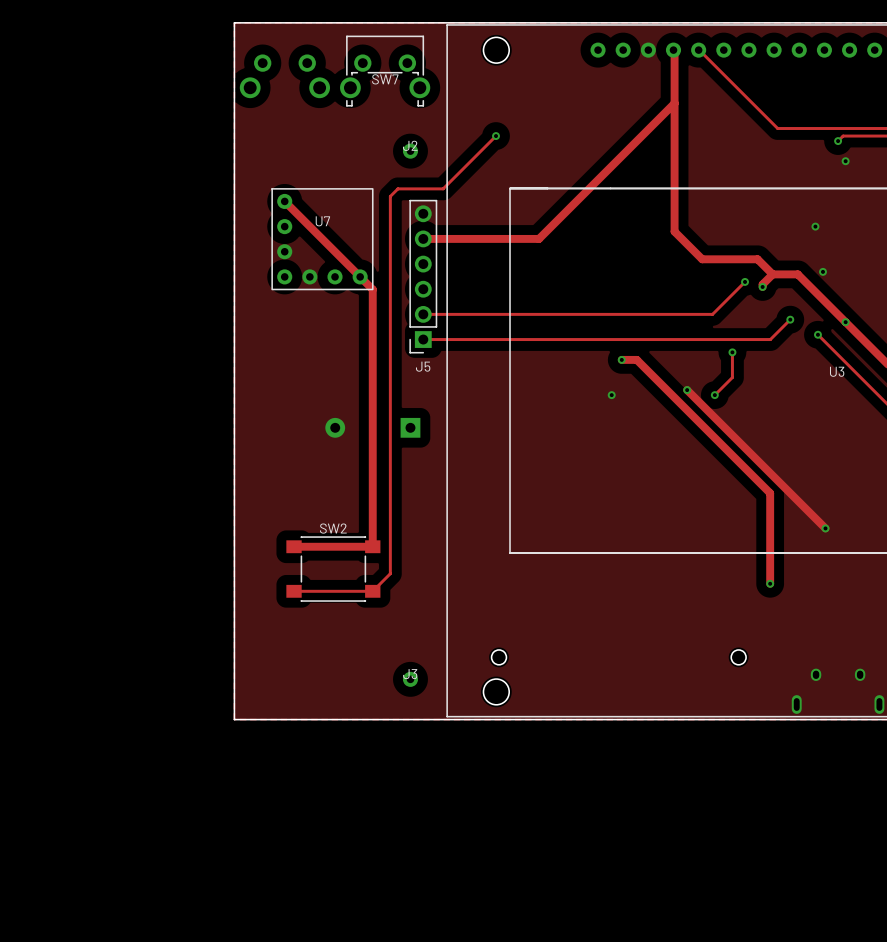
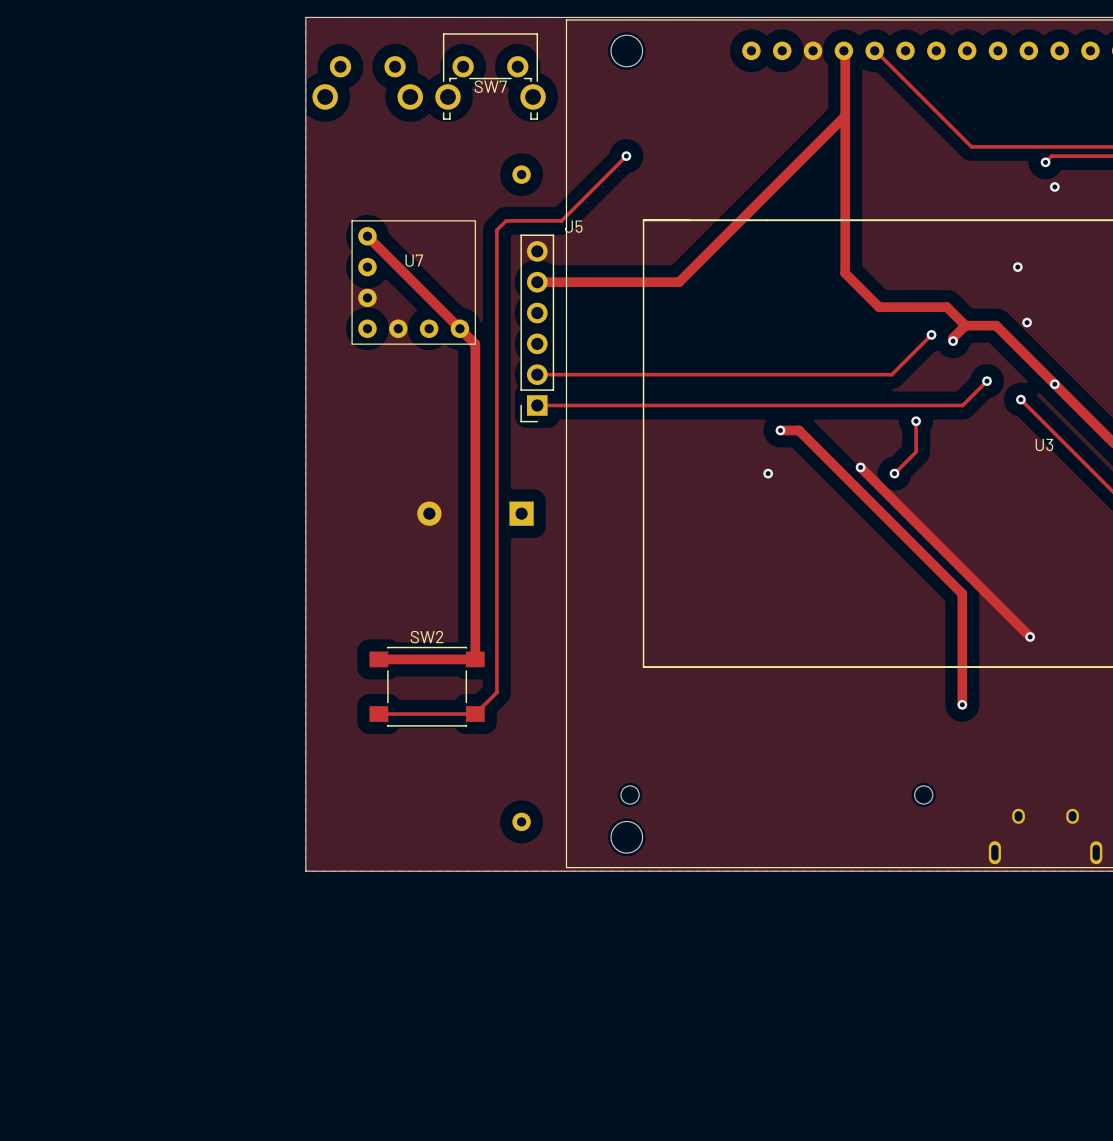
J2 name: J2 (410, 145) -> none
J5 name position: J5 (423, 366) -> J5 (573, 226)
J3 name: J3 (410, 674) -> none

